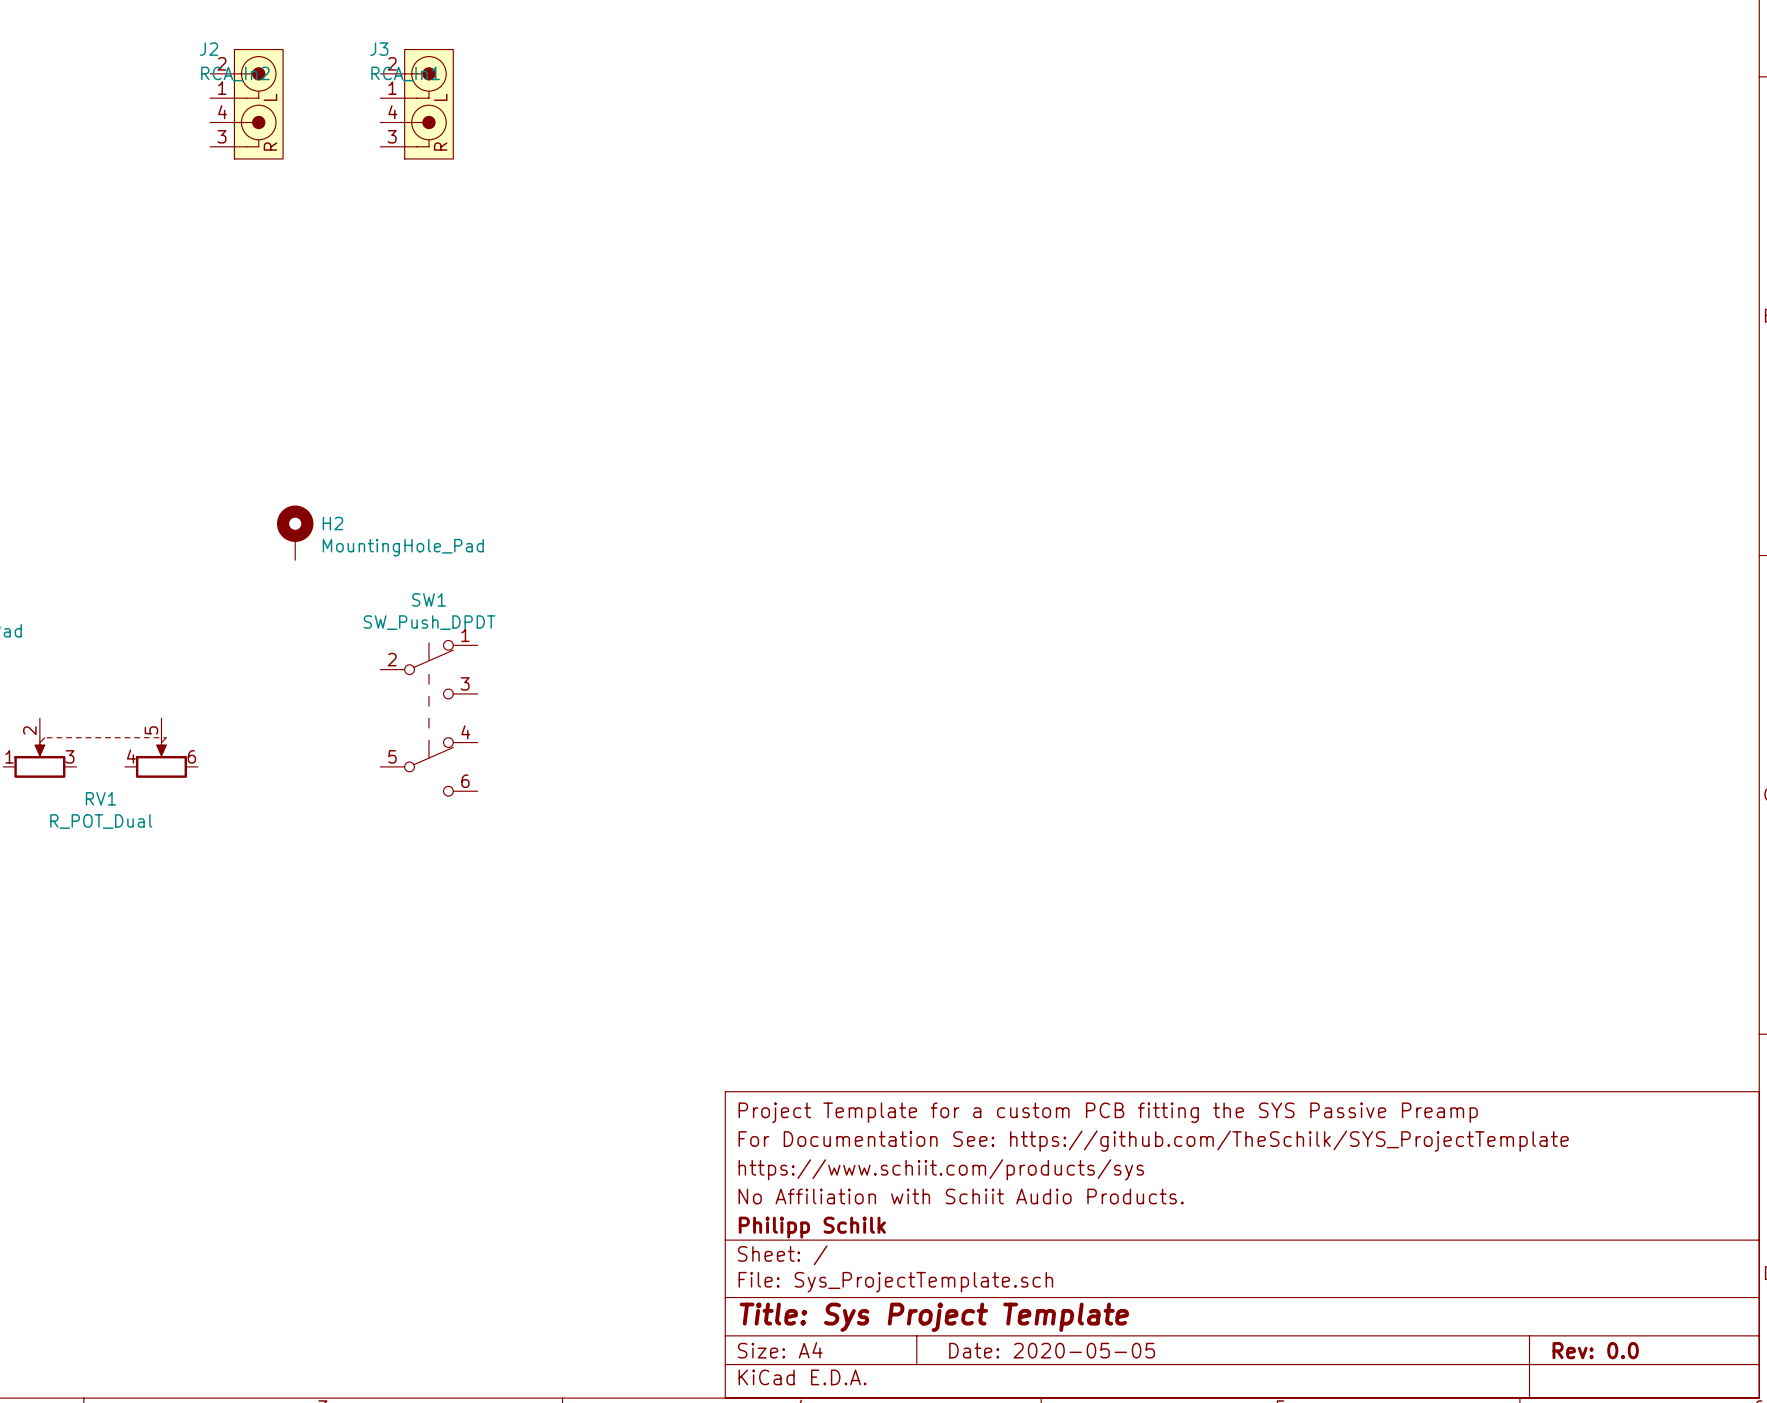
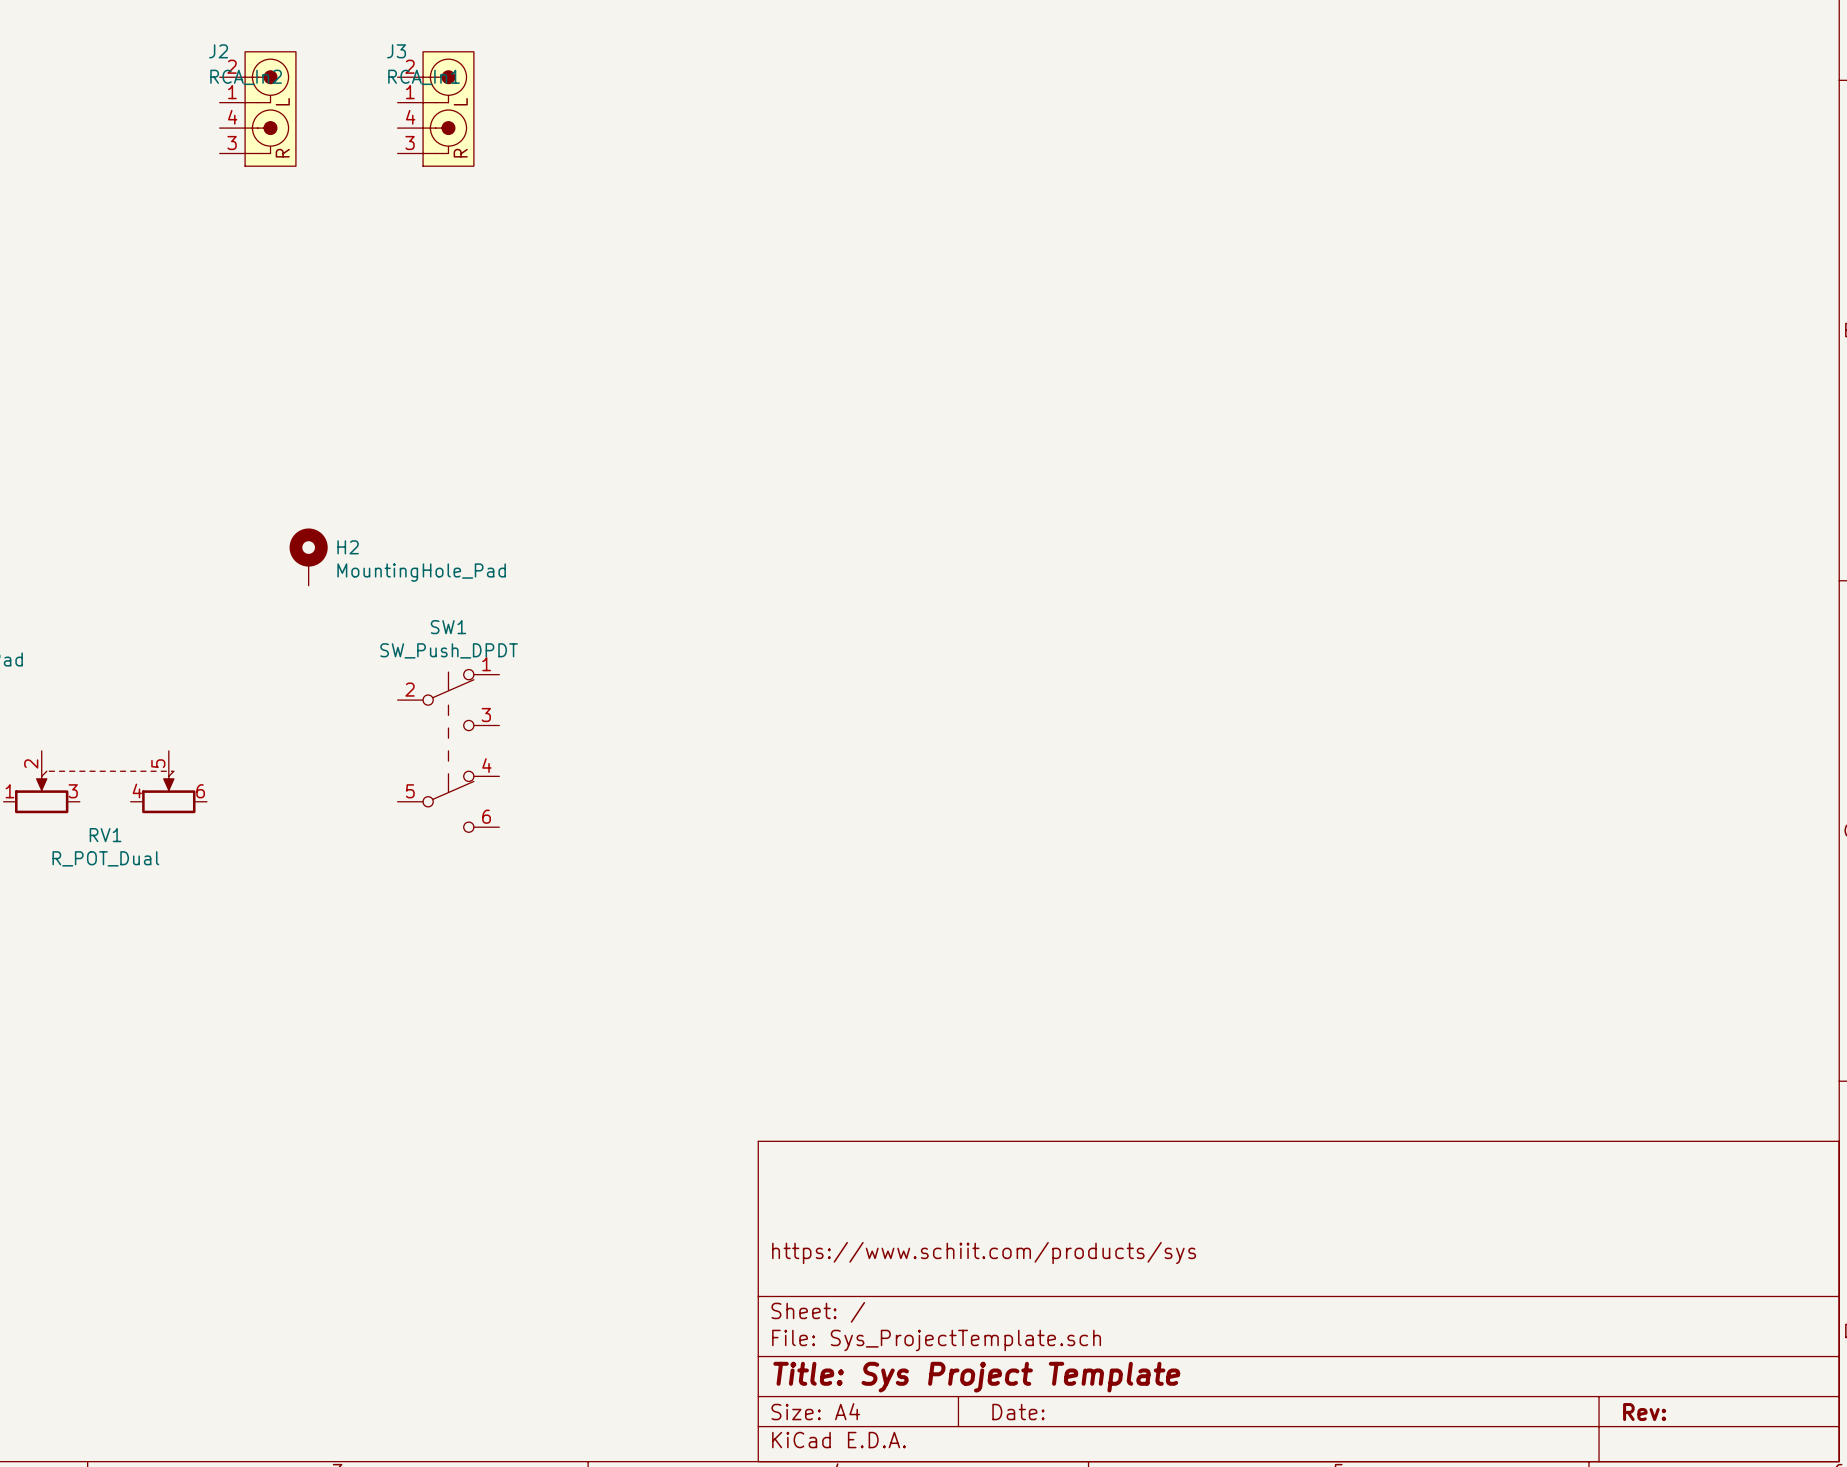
title block: Project Template for a custom PCB fitting the SYS Passive Preamp (1108, 1112) -> none
title block: For Documentation See: https://github.com/TheSchilk/SYS_ProjectTemplate (1153, 1141) -> none
title block: https://www.schiit.com/products/sys (941, 1169) -> none
title block: No Affiliation with Schiit Audio Products. (961, 1196) -> https://www.schiit.com/products/sys (984, 1253)
title block: Philipp Schilk (812, 1227) -> none
title block: Date: 2020-05-05 (1052, 1350) -> Date: (1018, 1412)
title block: Rev: 0.0 (1595, 1350) -> Rev: (1644, 1412)

